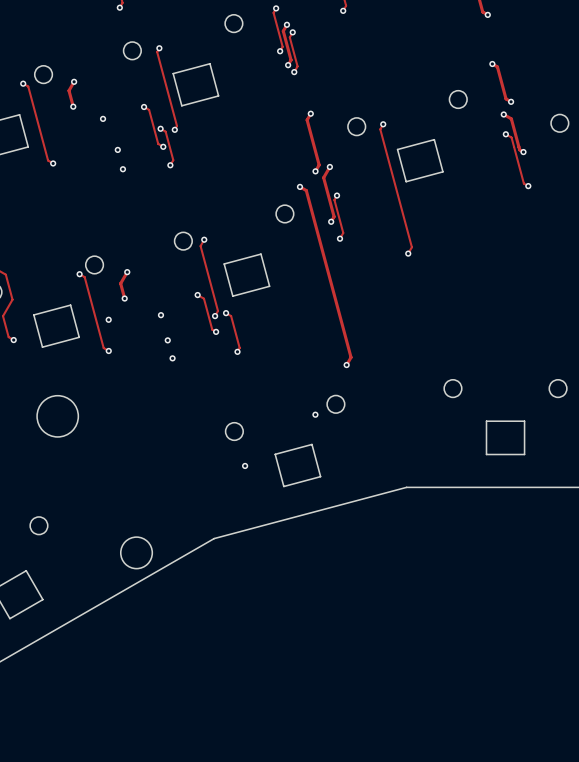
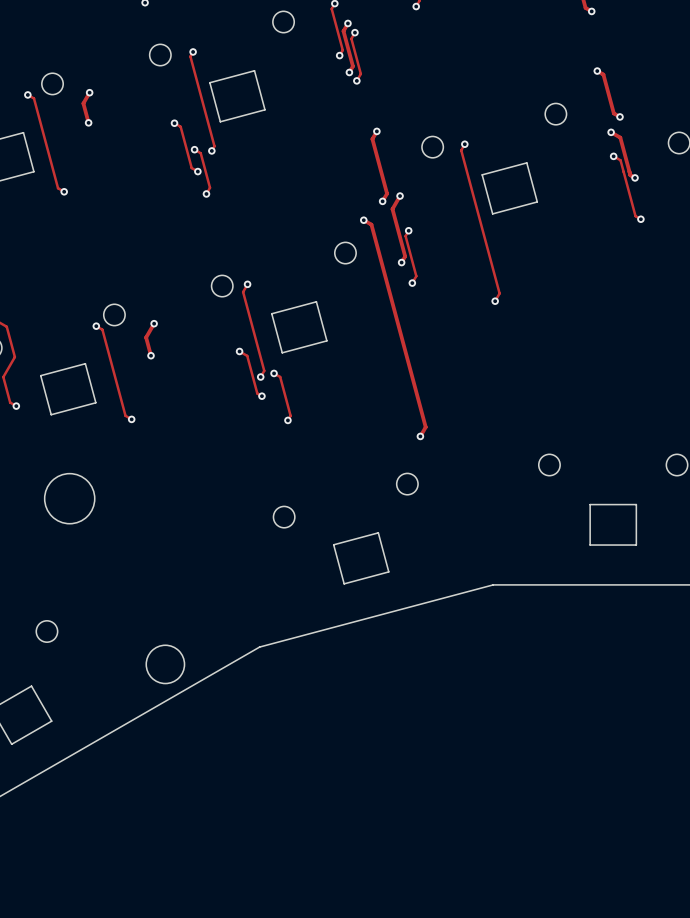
via: (103, 118) -> none
via: (117, 149) -> none
via: (122, 169) -> none
via: (160, 315) -> none
via: (108, 319) -> none
via: (167, 340) -> none
via: (172, 358) -> none
via: (315, 414) -> none
via: (245, 465) -> none

